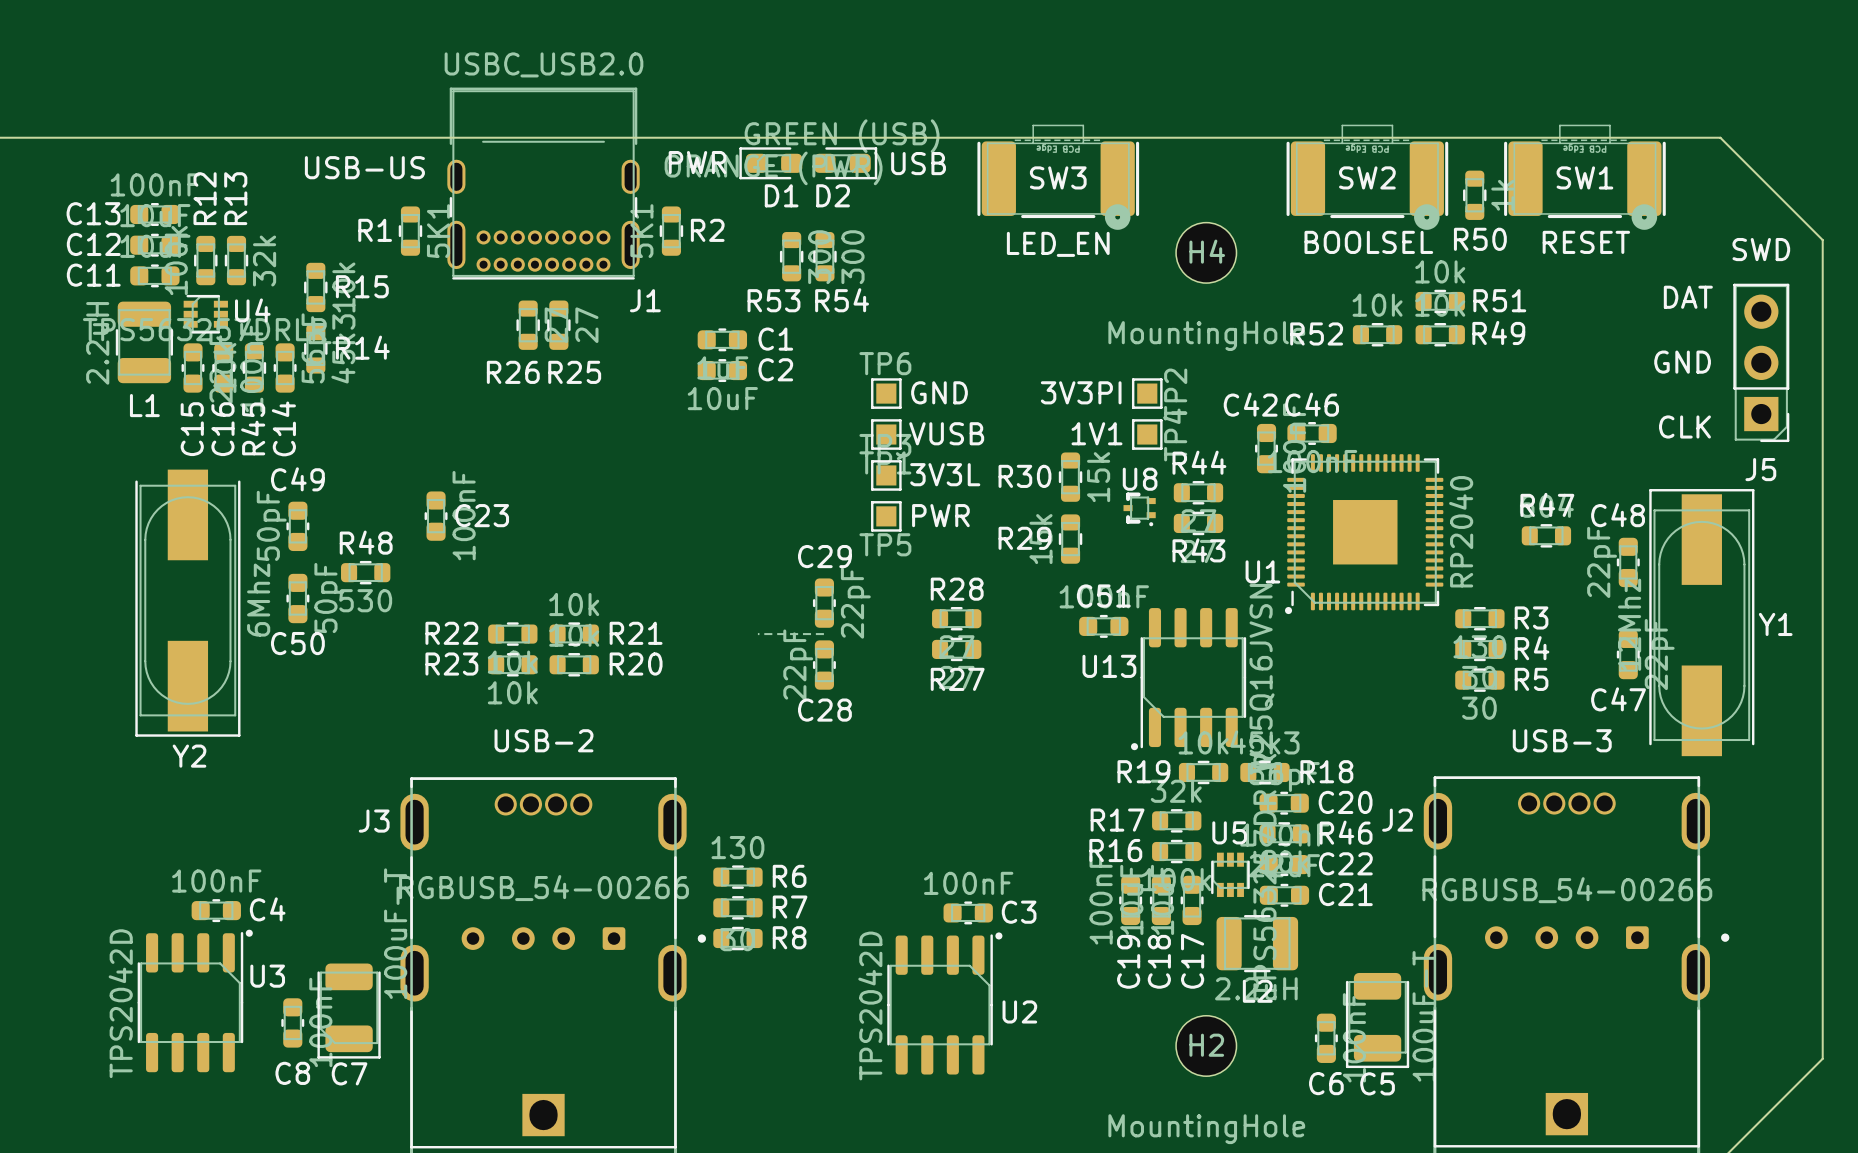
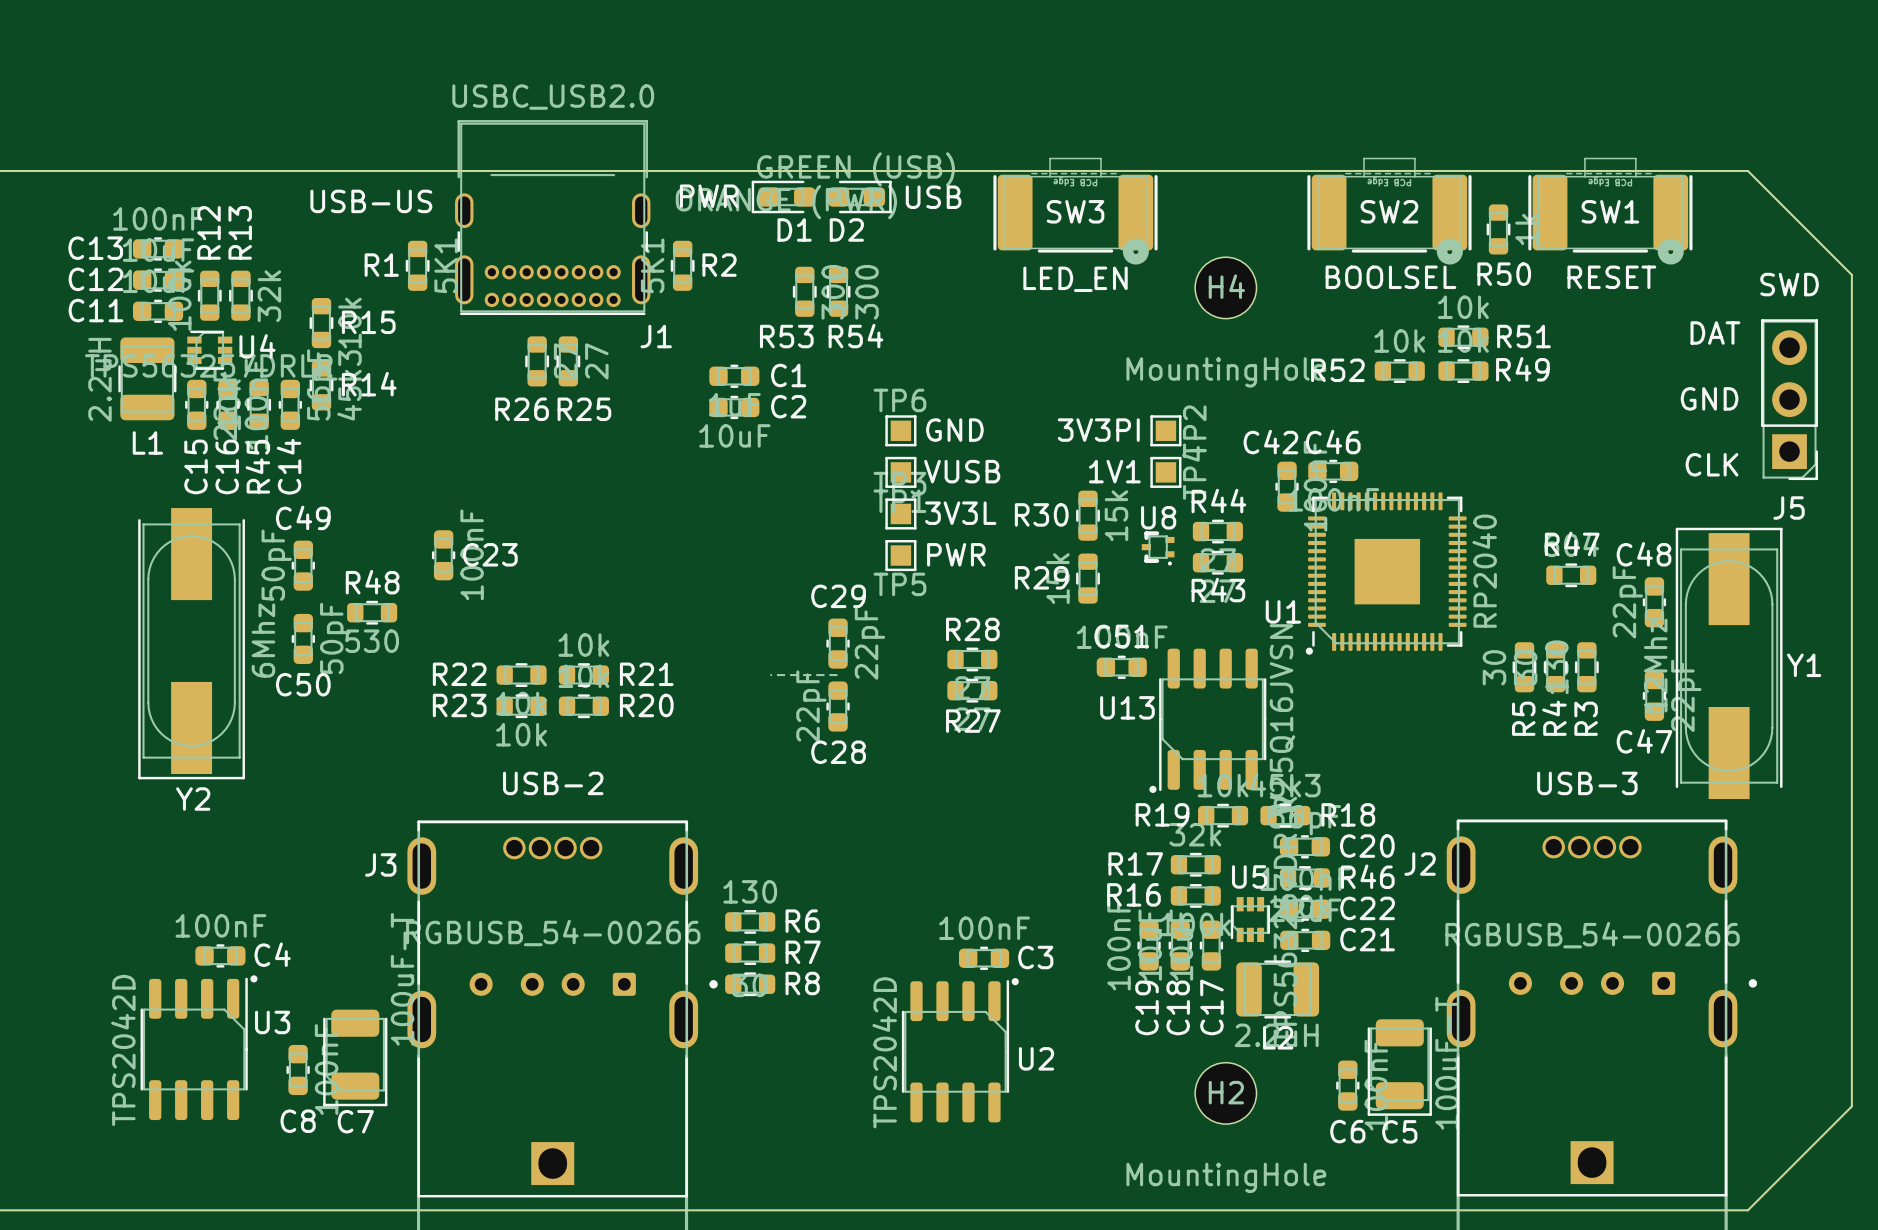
R3 rotation: 0° (1479, 618) -> 90° clockwise (1586, 667)
R3 position: (1479, 618) -> (1586, 667)
R4 rotation: 0° (1479, 649) -> 90° clockwise (1555, 667)
R4 position: (1479, 649) -> (1555, 667)
R5 rotation: 0° (1479, 680) -> 90° clockwise (1524, 667)
R5 position: (1479, 680) -> (1524, 667)

